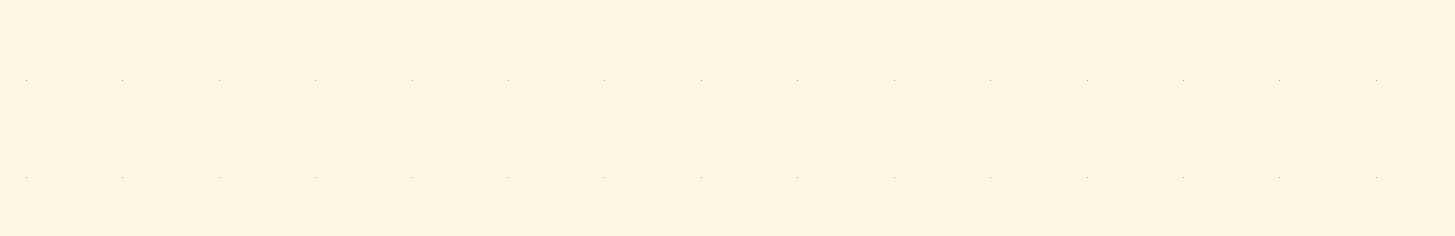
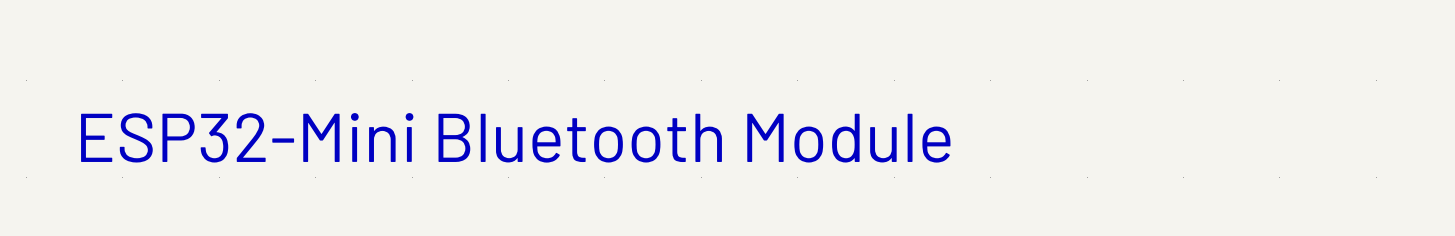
text: none -> ESP32-Mini Bluetooth Module (515, 137)

